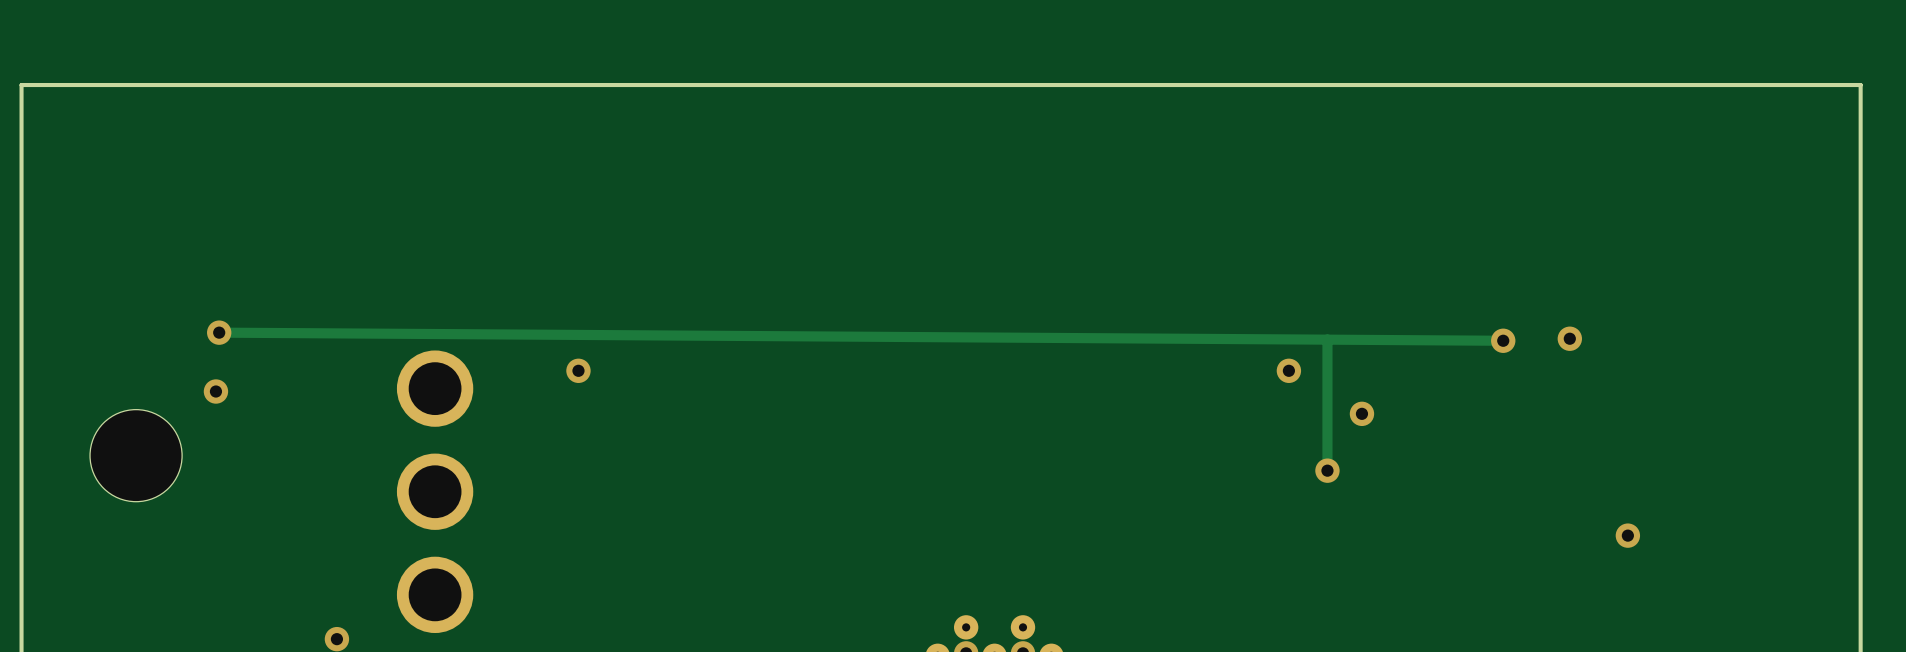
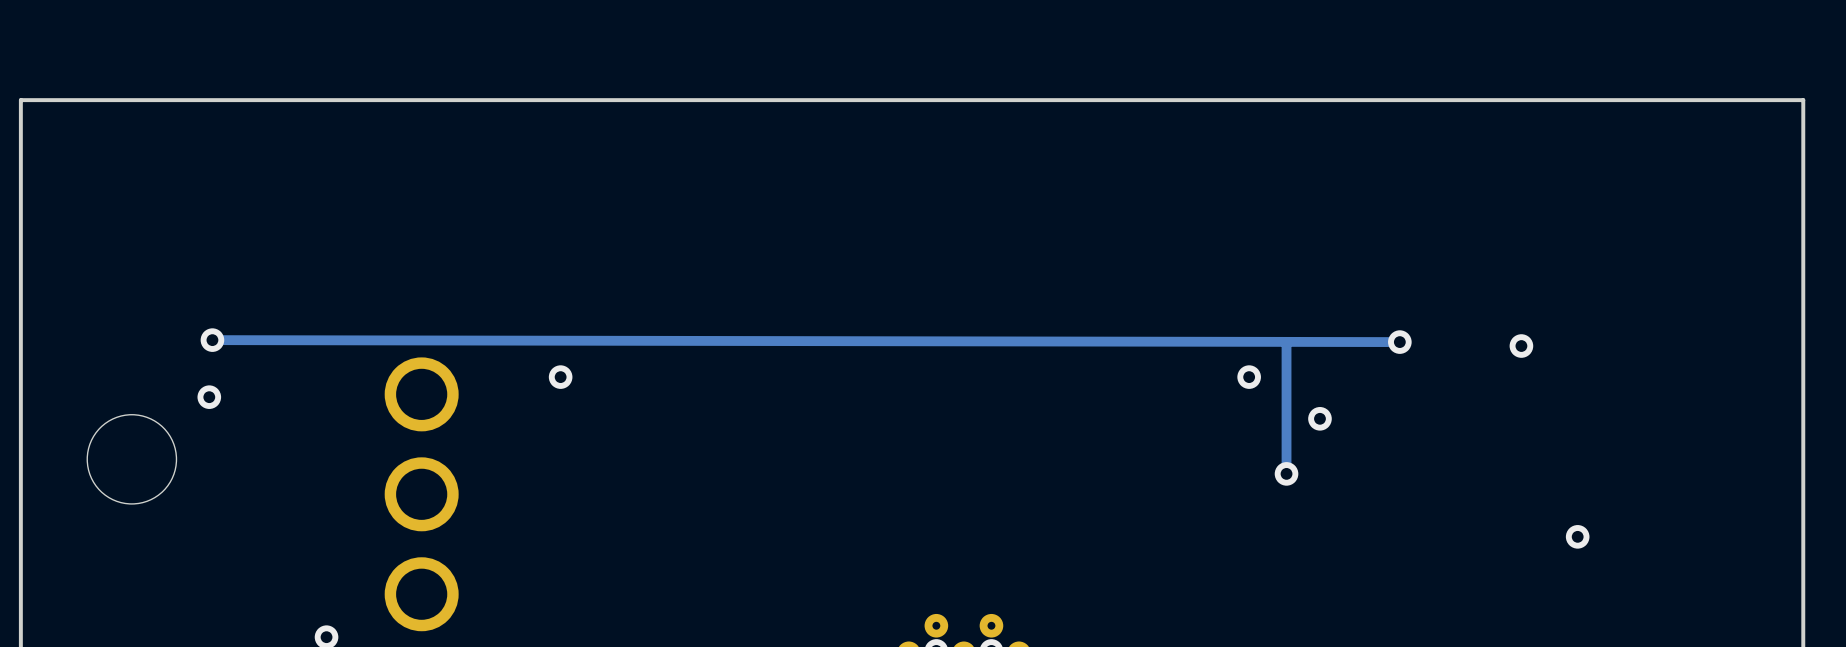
track: (219, 332) (1503, 340) -> (212, 340) (1399, 342)
via position: (1503, 340) -> (1399, 342)

